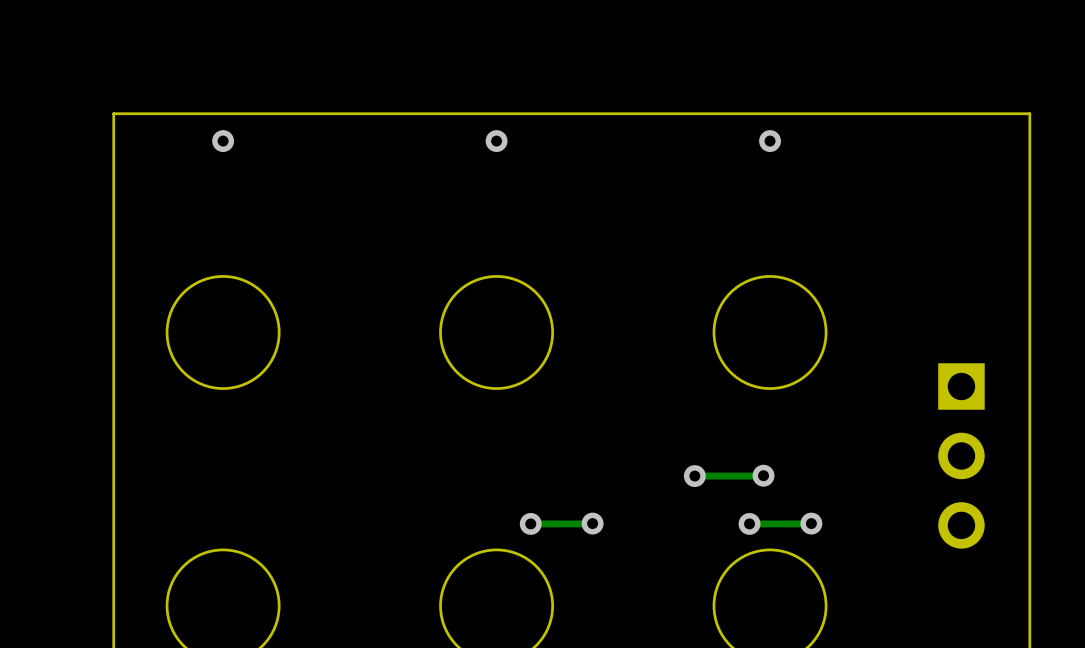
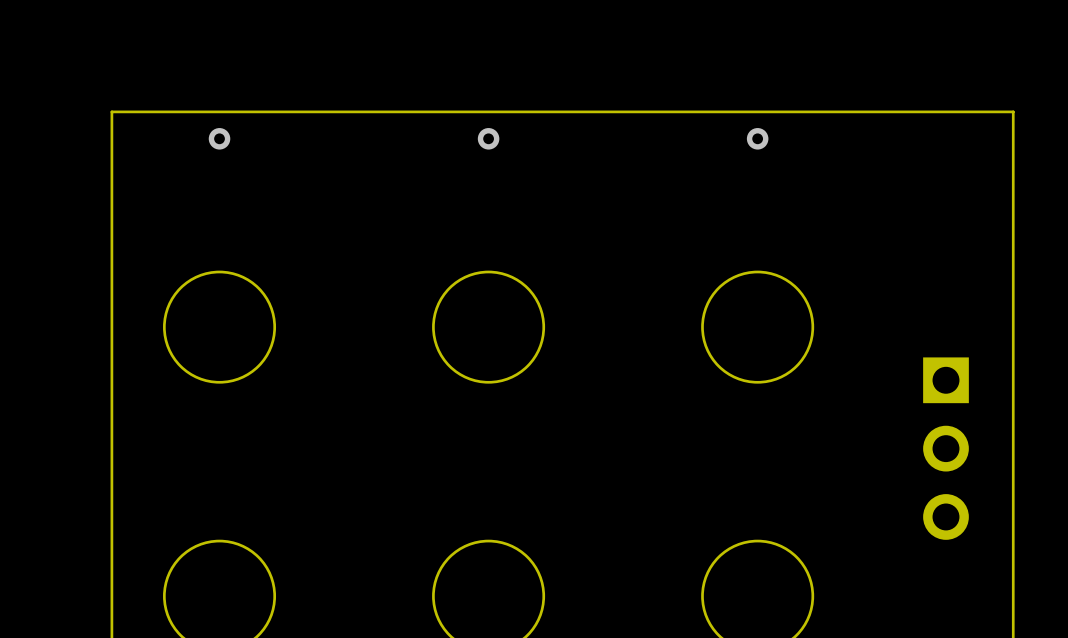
via: (763, 475) -> none
via: (694, 476) -> none
track: (763, 476) (694, 476) -> none
via: (530, 523) -> none
track: (592, 523) (530, 523) -> none
via: (592, 523) -> none
via: (749, 523) -> none
track: (811, 523) (749, 523) -> none
via: (811, 523) -> none

